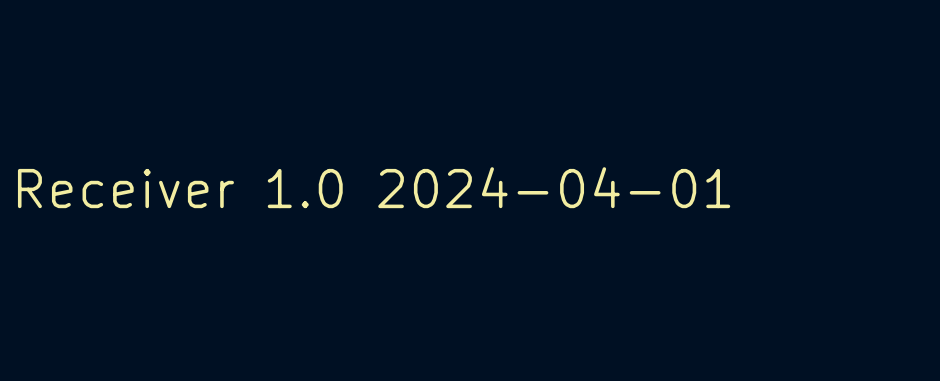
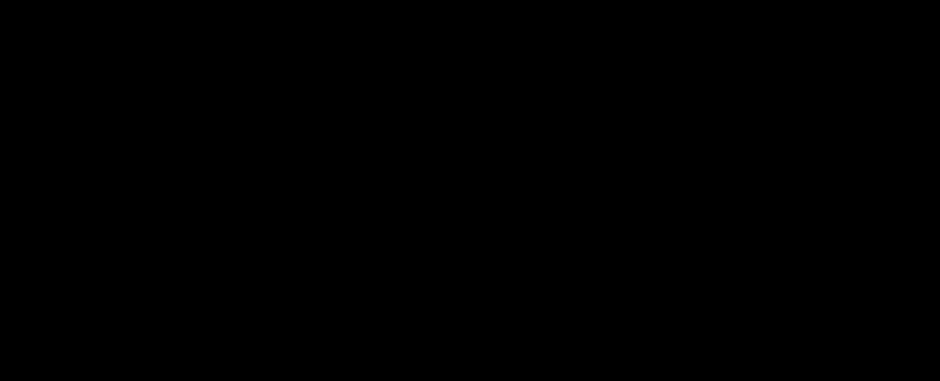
text: Receiver 1.0 2024-04-01 (374, 187) -> none

